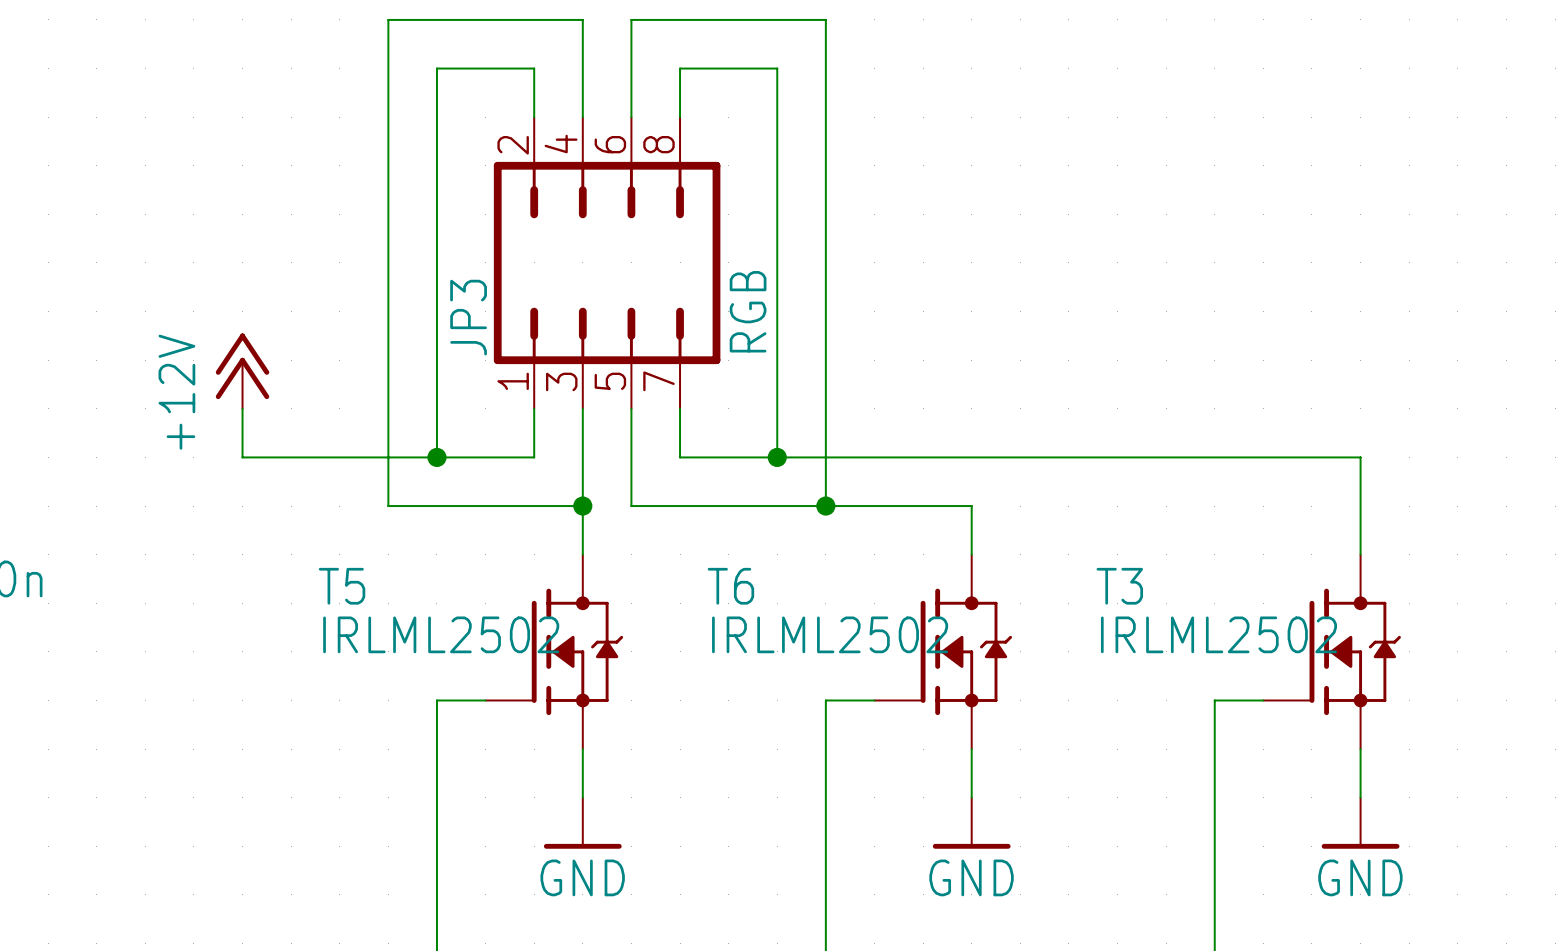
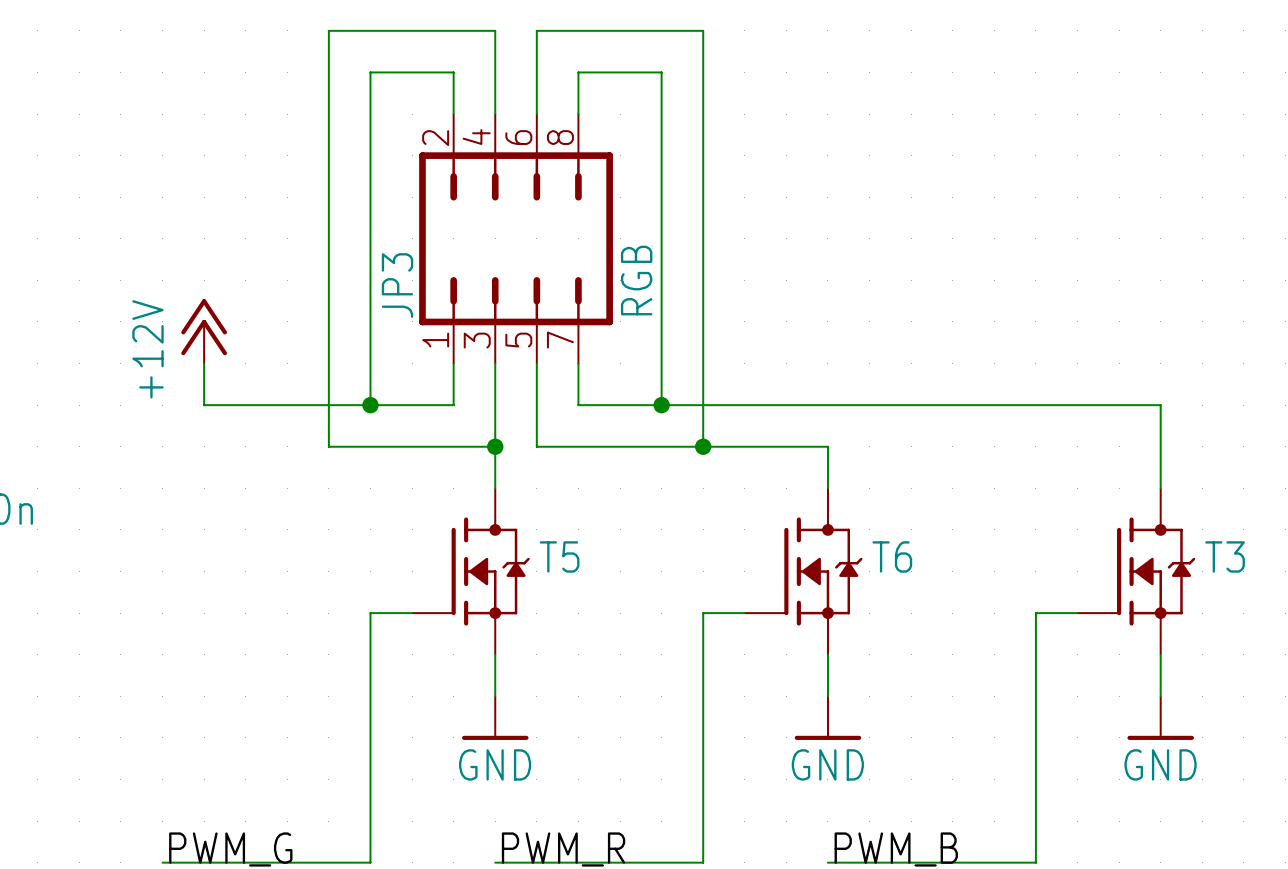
T5 name position: T5 (342, 586) -> T5 (559, 556)
T6 name position: T6 (730, 586) -> T6 (892, 556)
T3 name position: T3 (1119, 586) -> T3 (1225, 556)
T5 value: IRLML2502 (441, 634) -> none
T6 value: IRLML2502 (830, 634) -> none
T3 value: IRLML2502 (1218, 634) -> none

